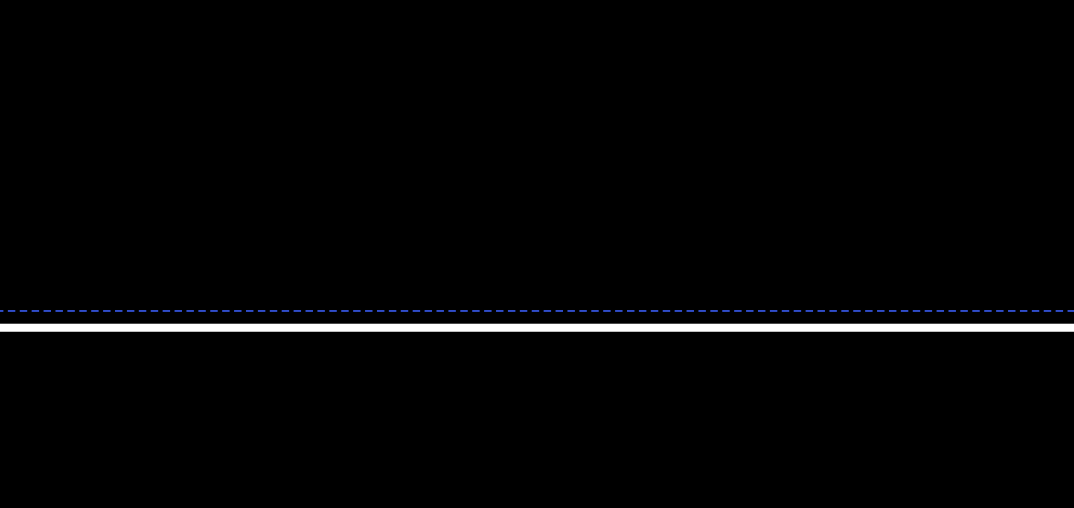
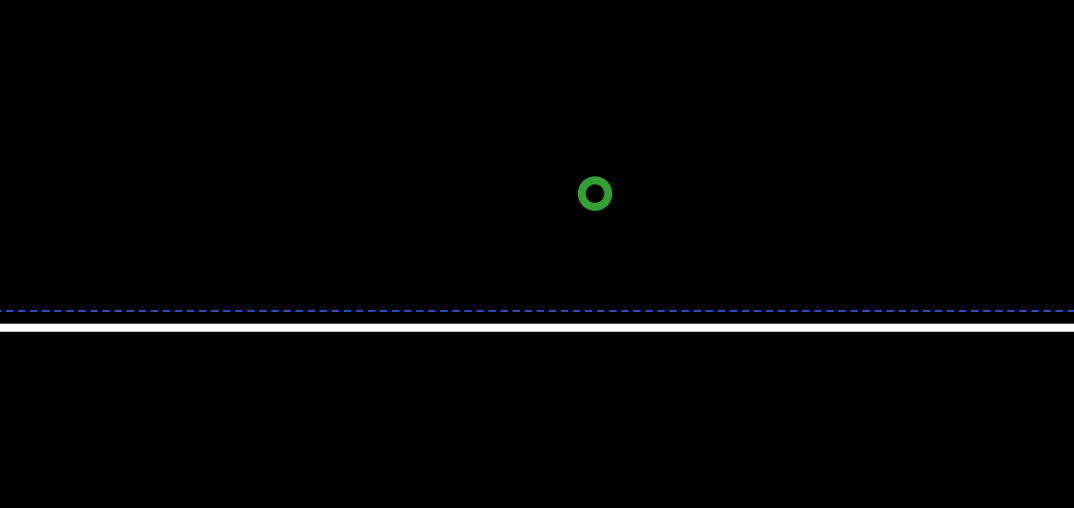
via: none -> (595, 193)

